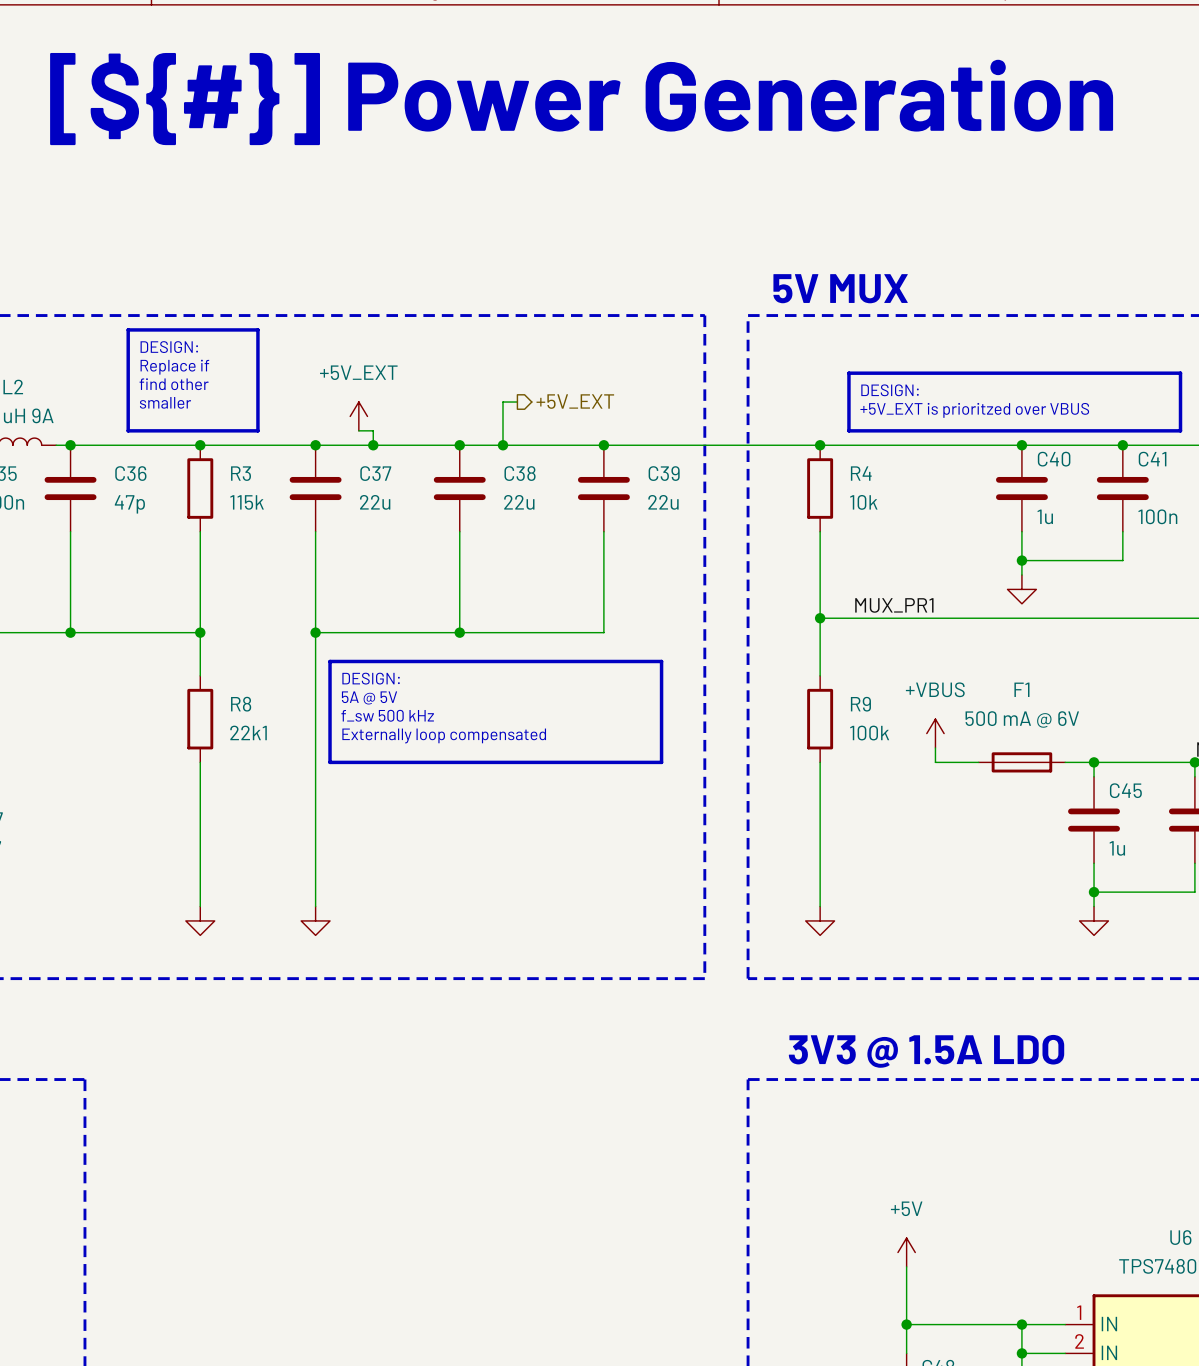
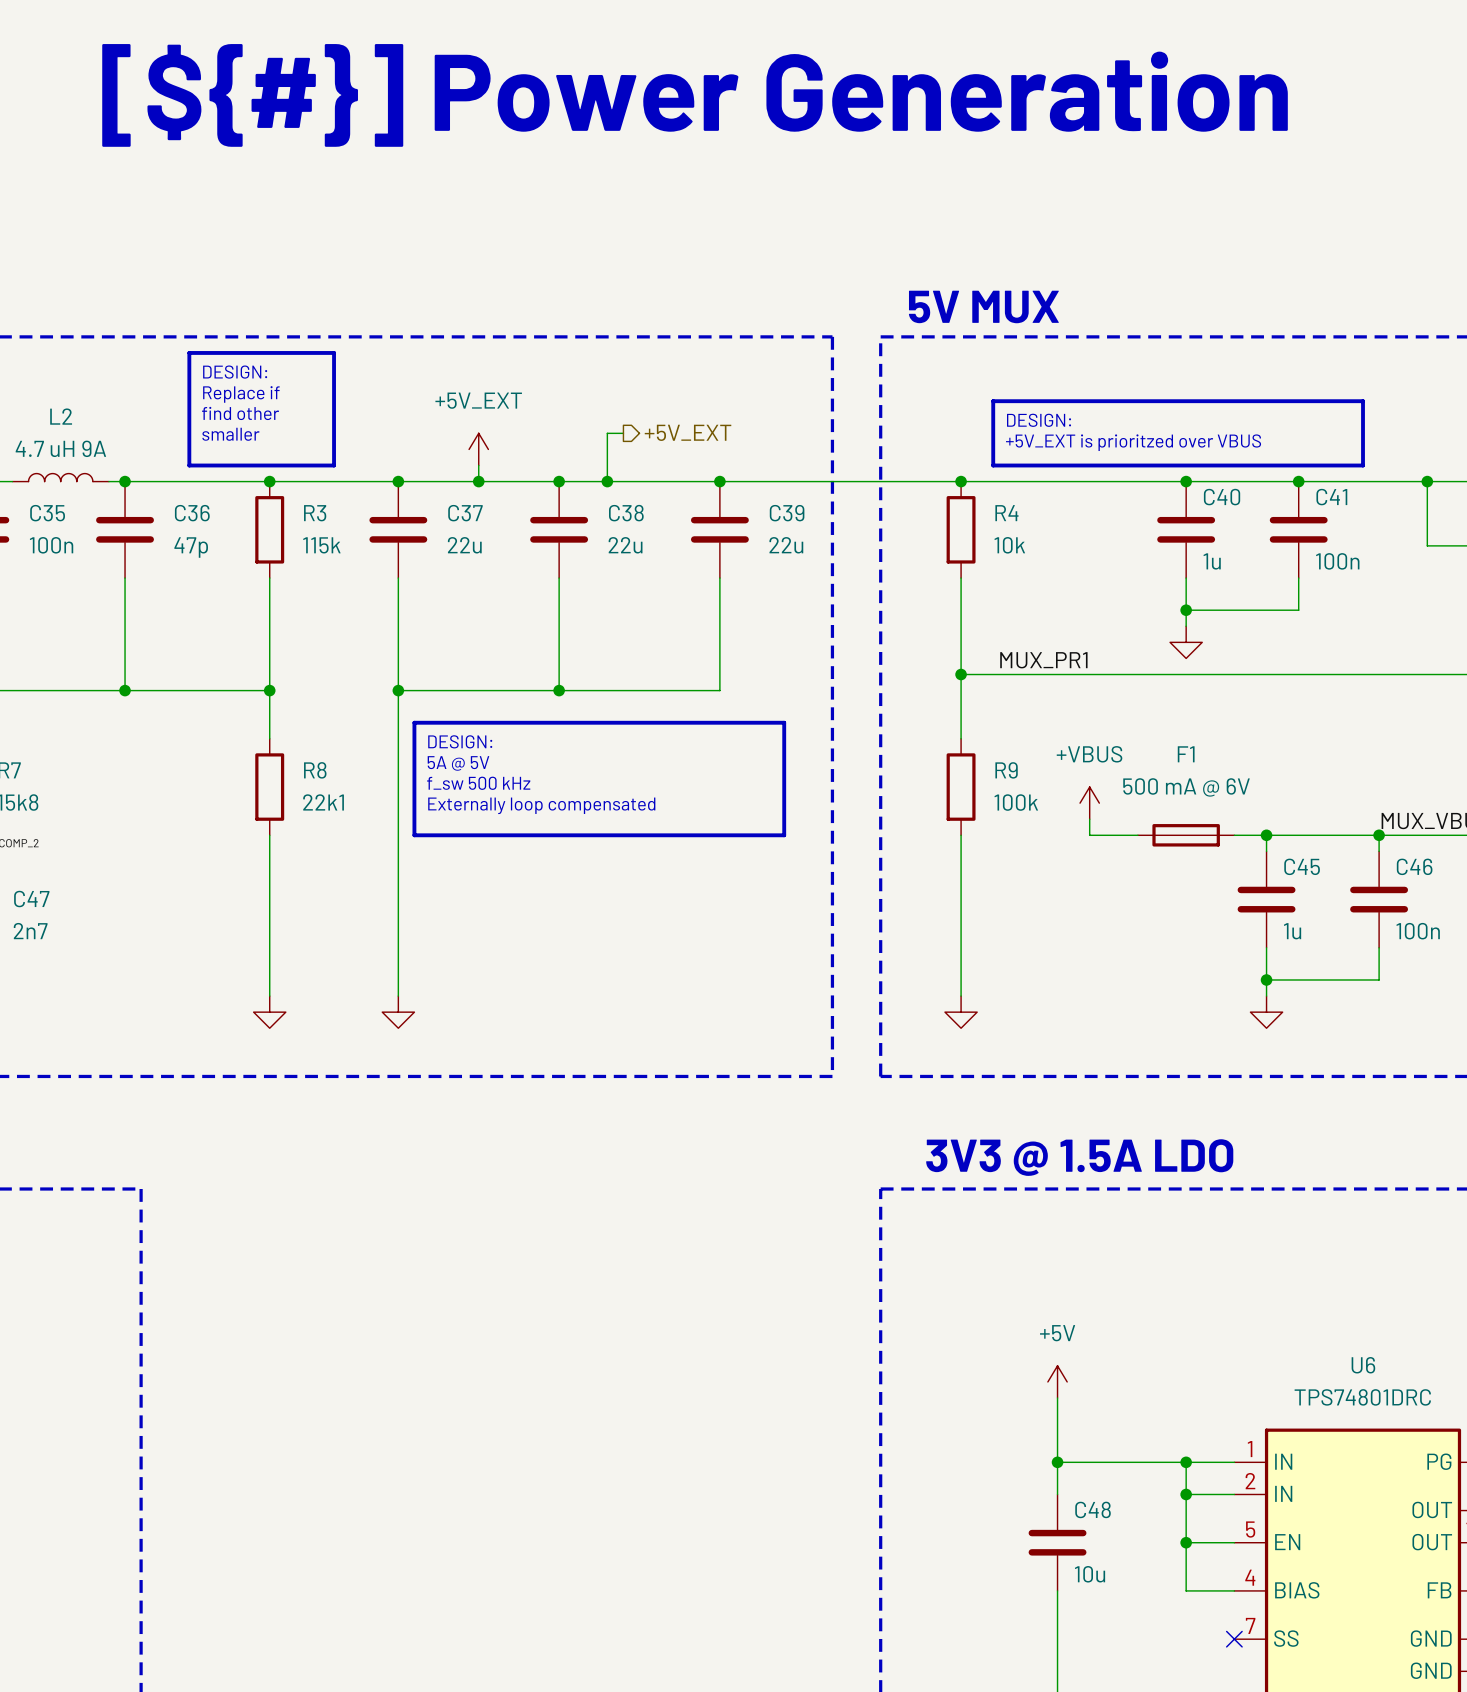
power symbol position: +5V_EXT (358, 416) -> +5V_EXT (478, 449)
wire: (358, 430) (373, 430) (373, 445) -> none
wire: none -> (478, 465) (478, 481)
junction position: (373, 445) -> (478, 481)

